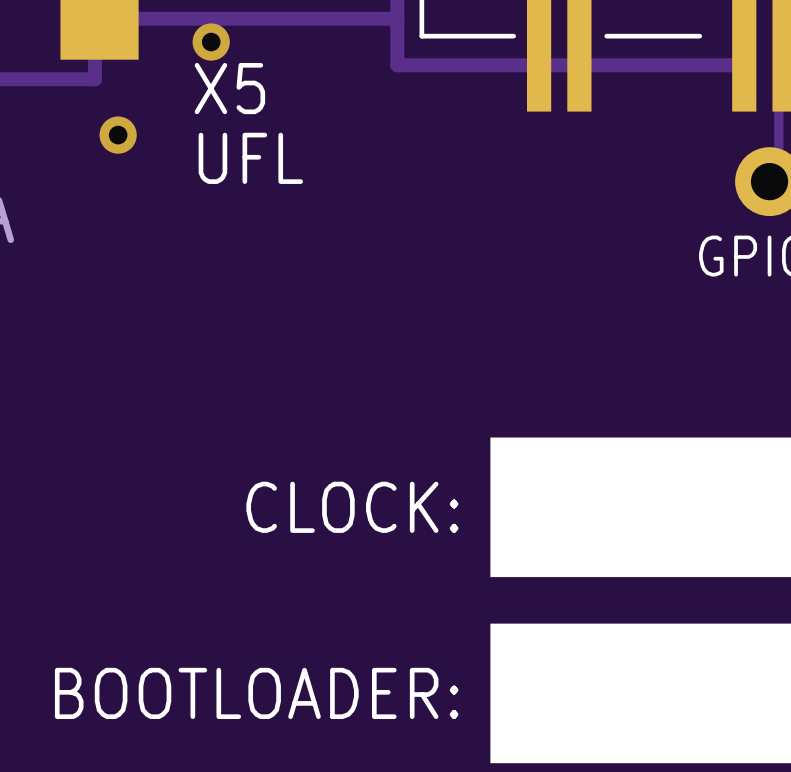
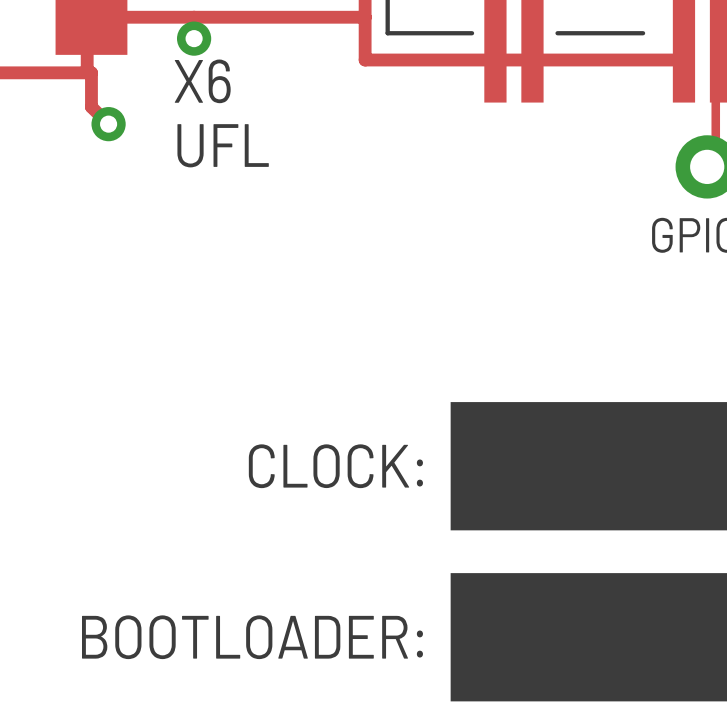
track: none -> (87, 72) (91, 72) (91, 107) (108, 124)
X5 name: X5 (229, 88) -> X6 (202, 81)

